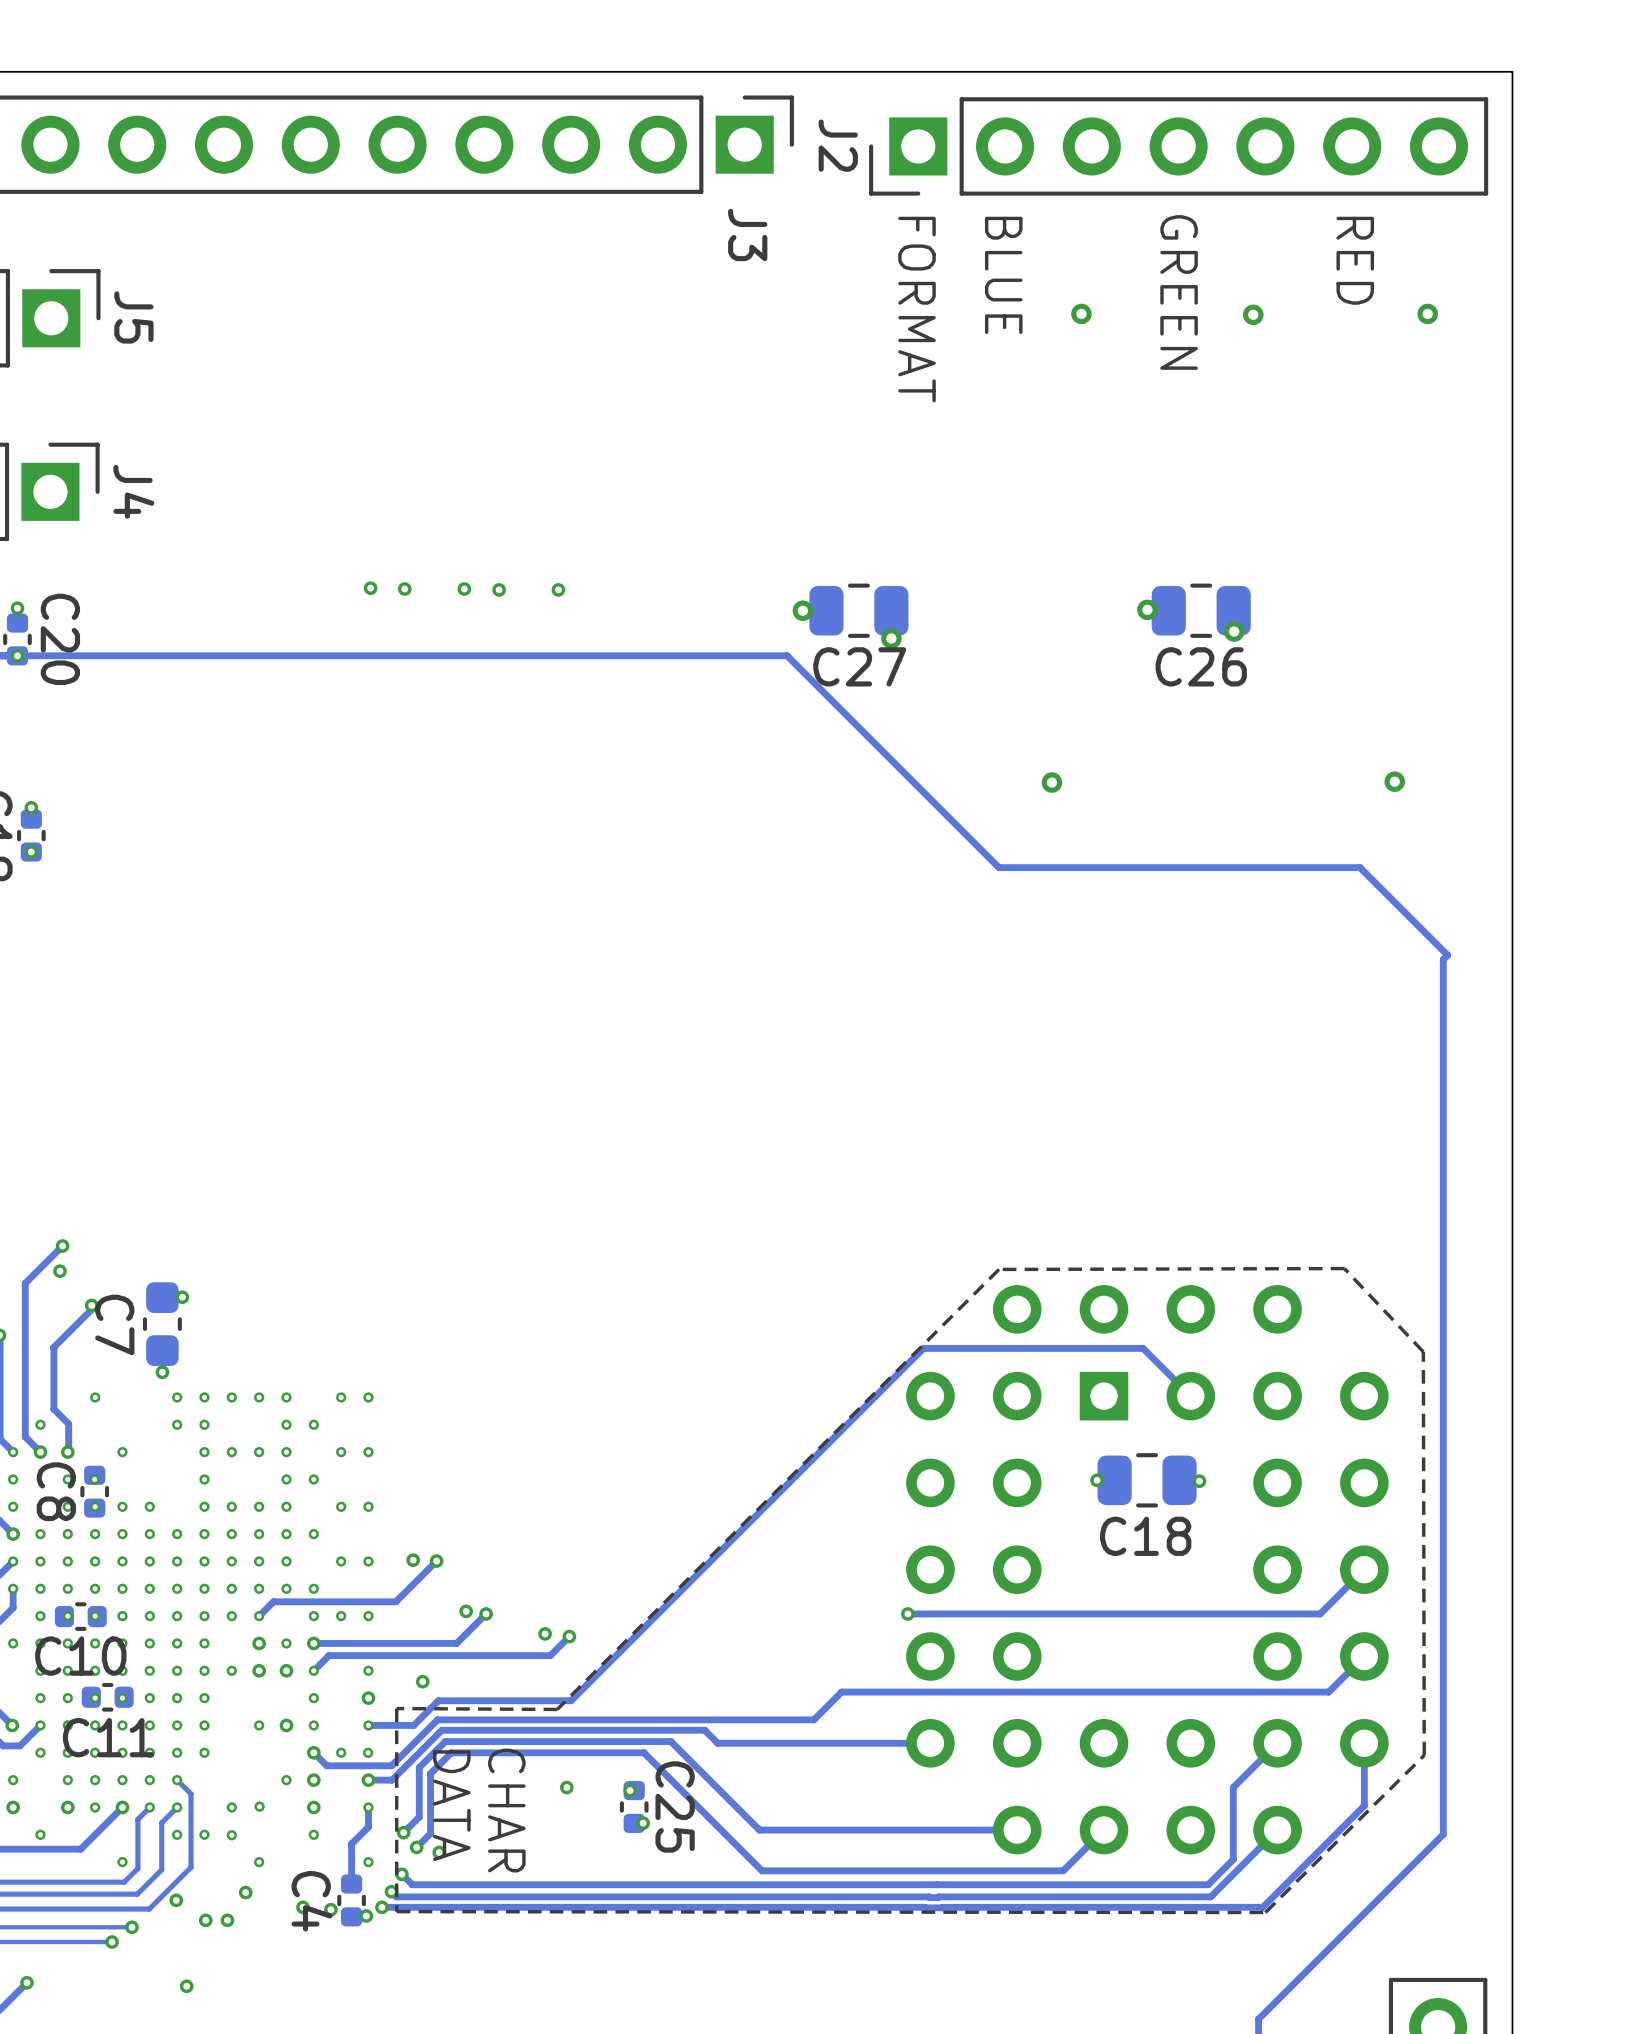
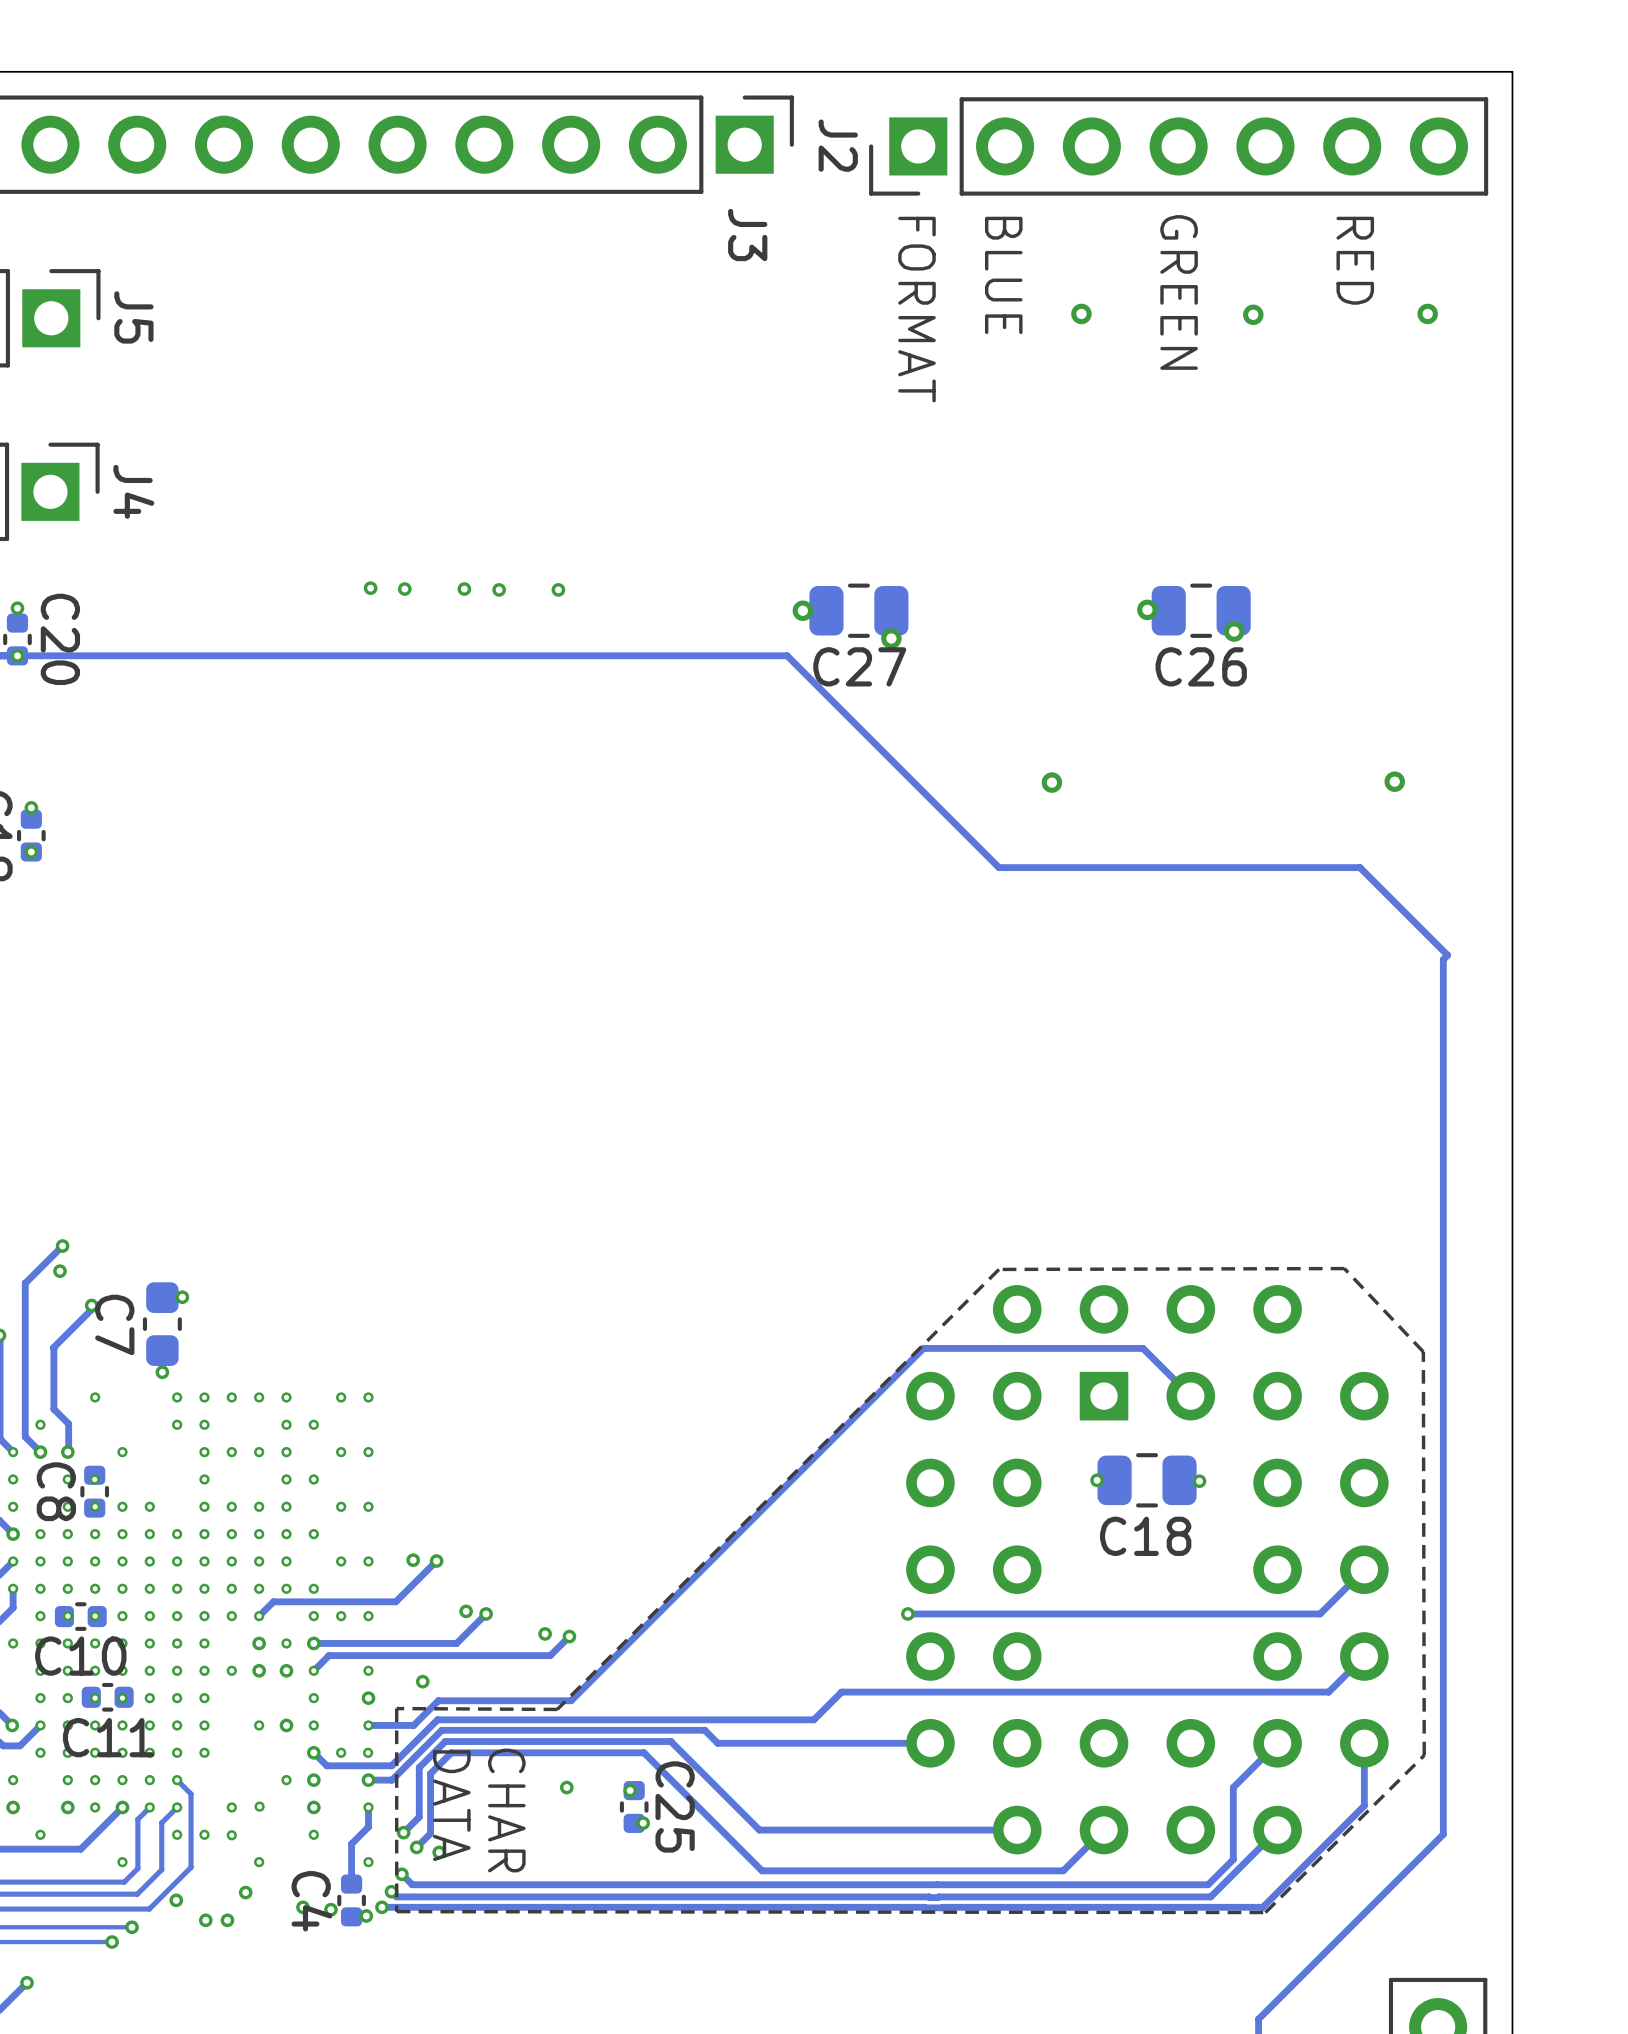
via: (186, 1986) -> none

